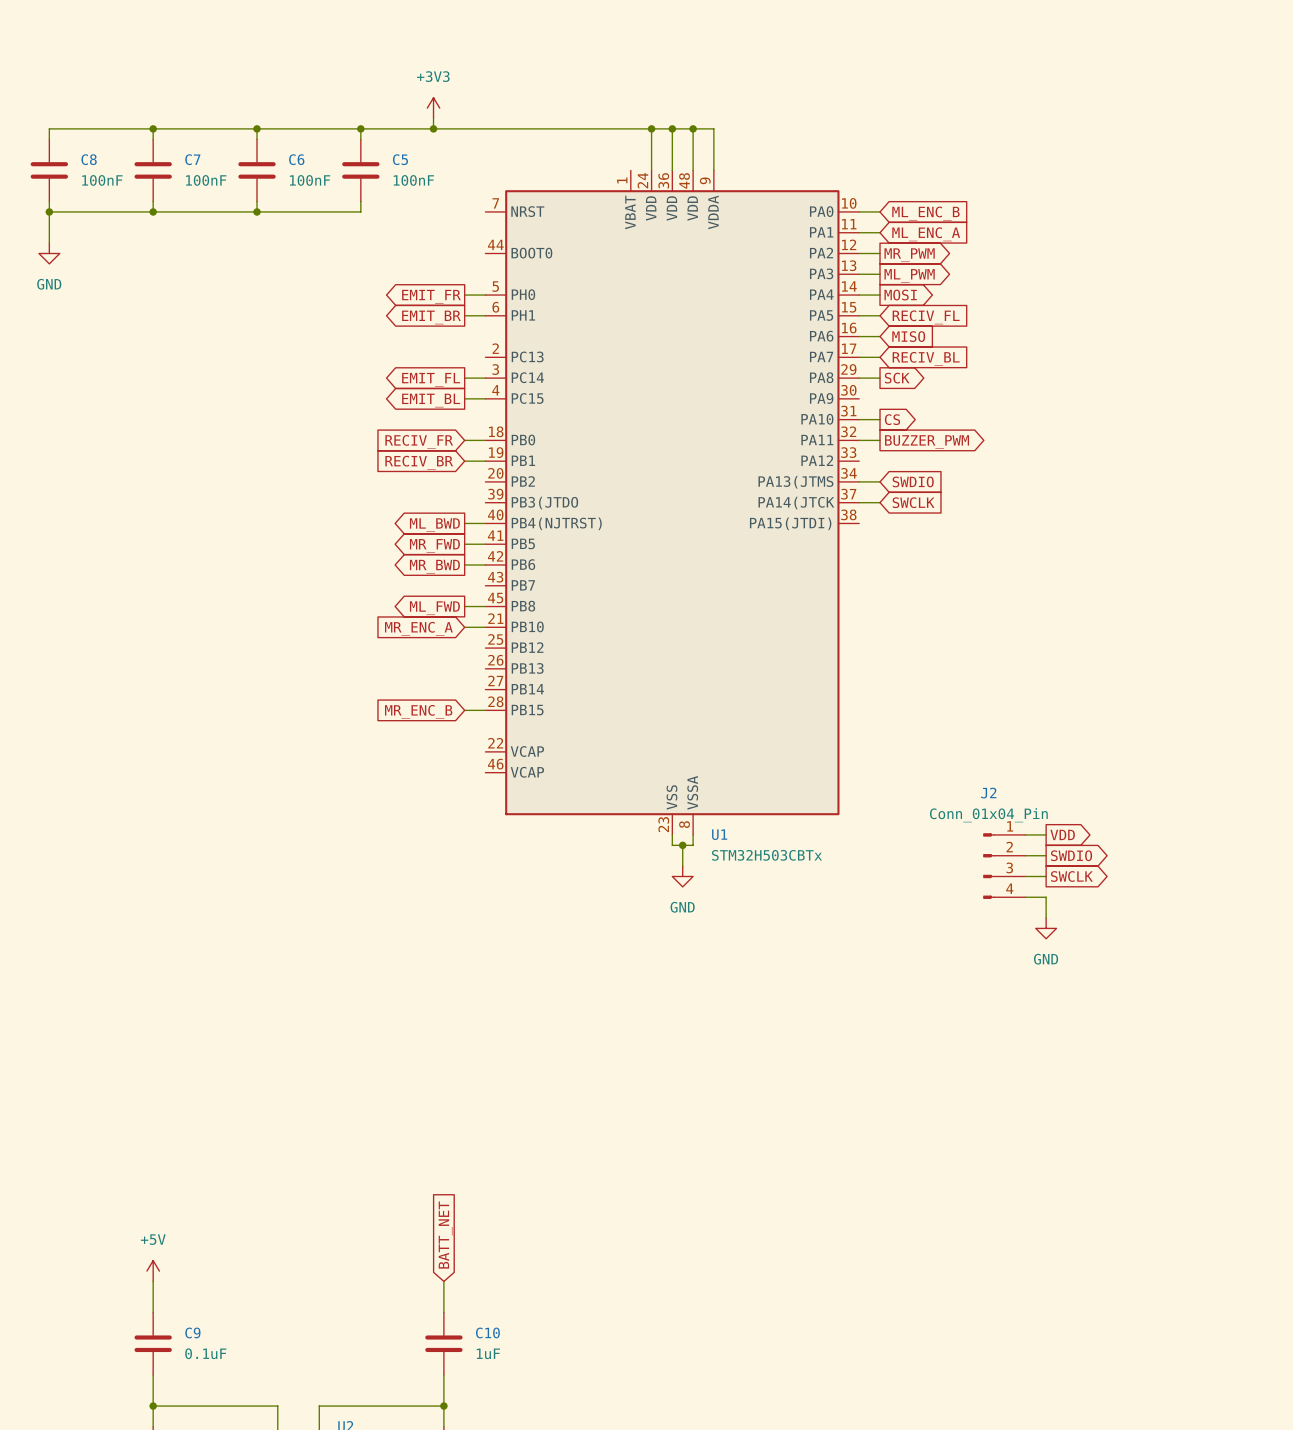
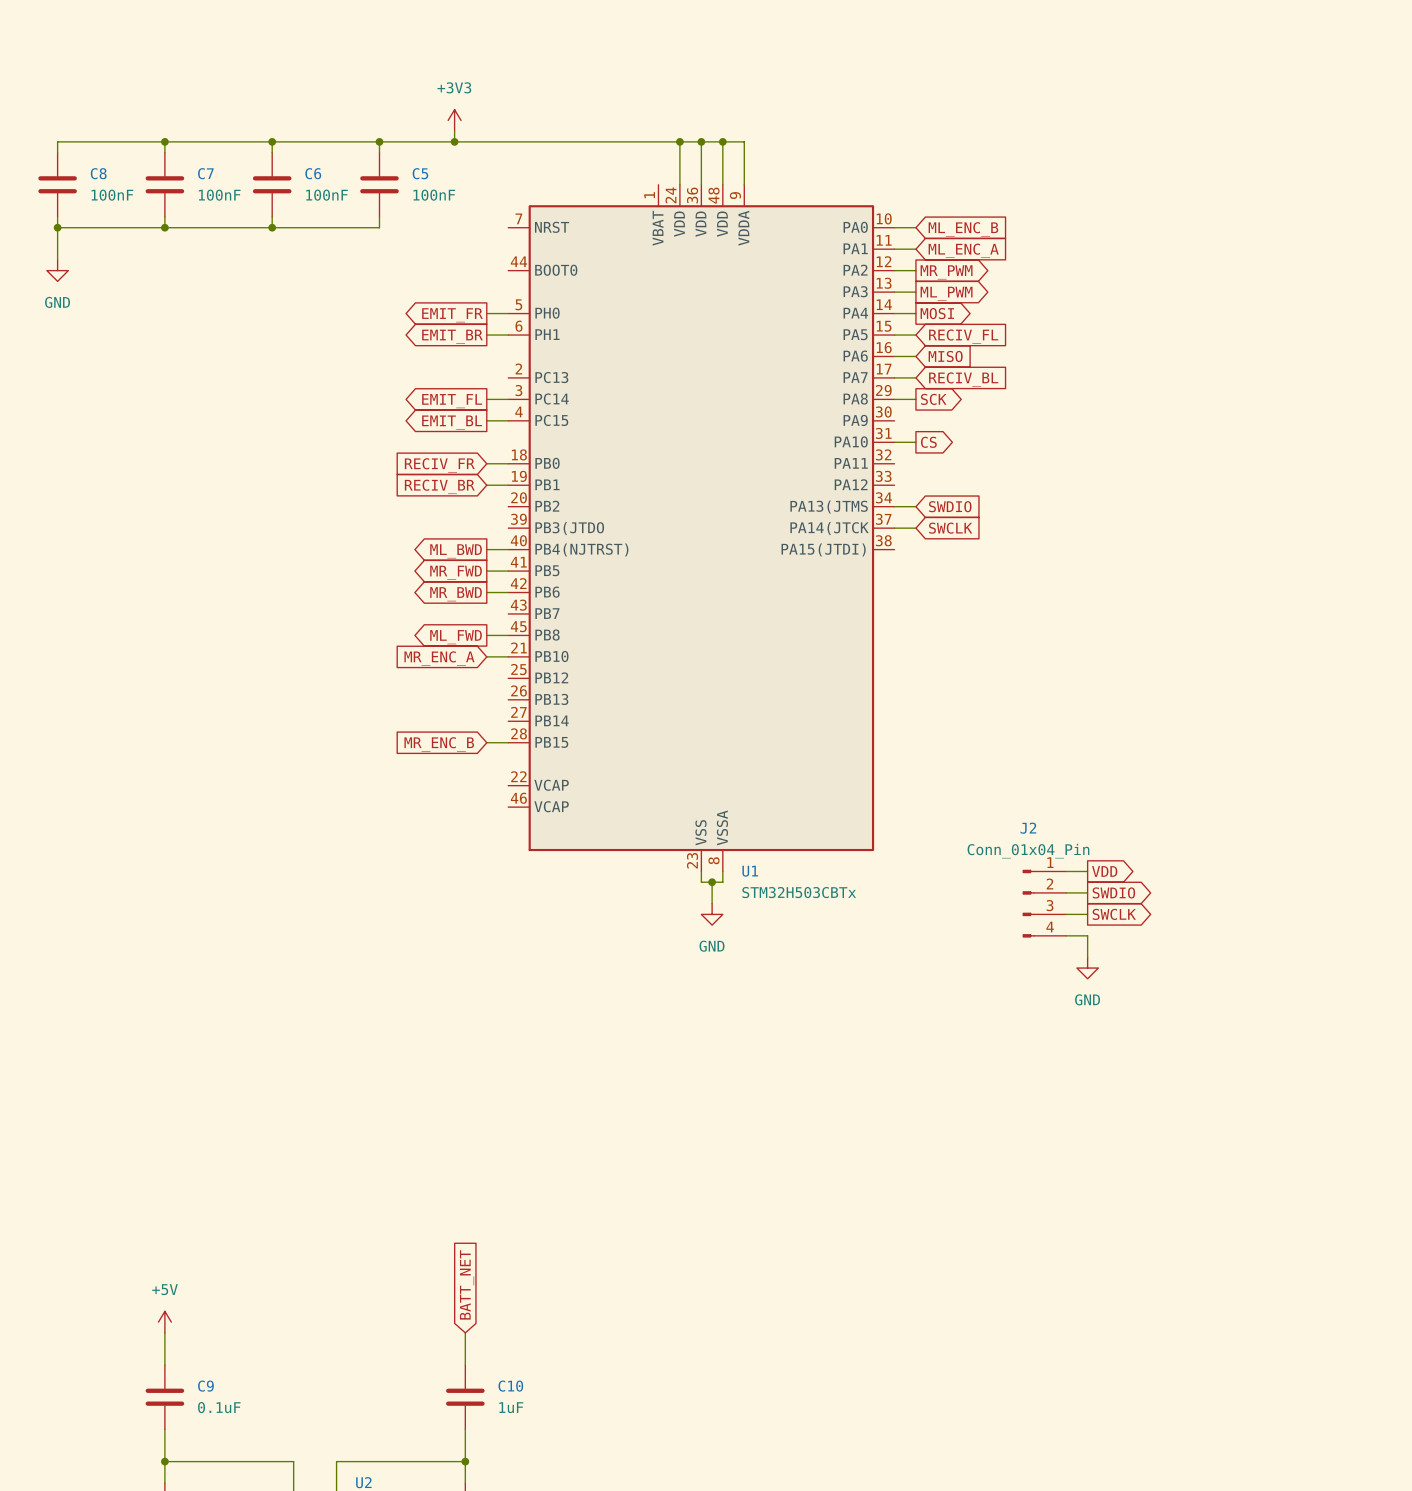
wire: (859, 440) (880, 440) -> none
global label: BUZZER_PWM (927, 442) -> none

